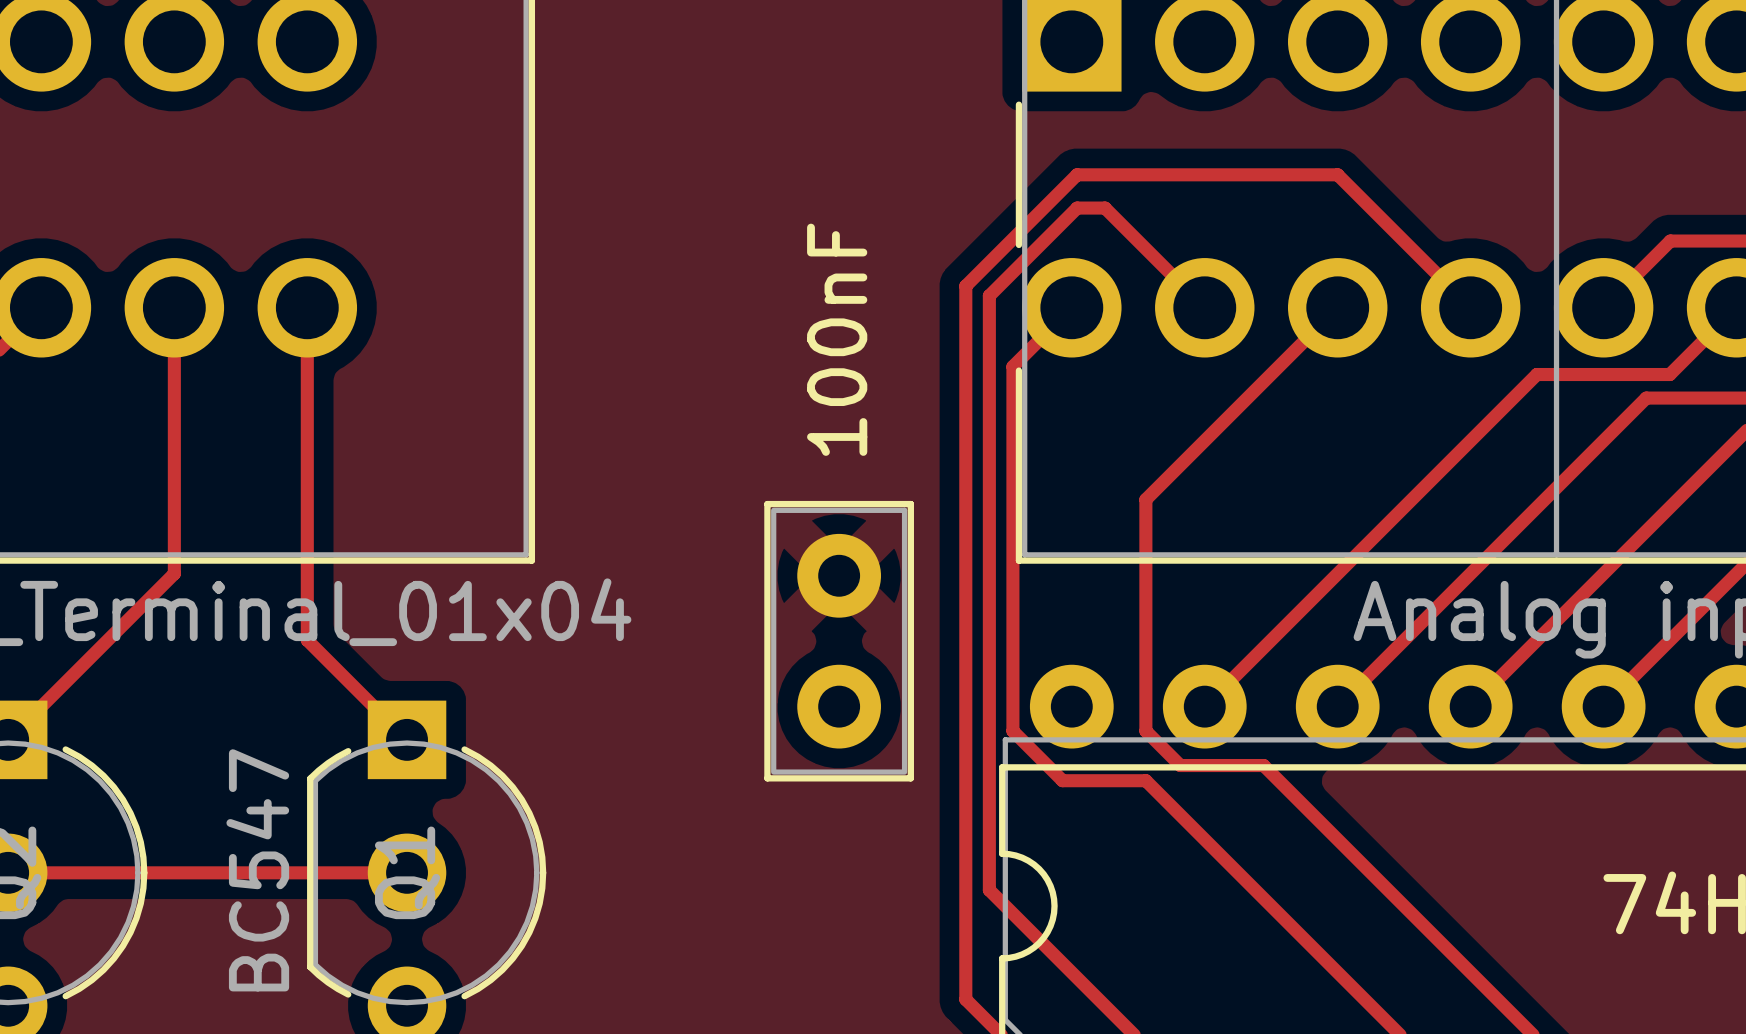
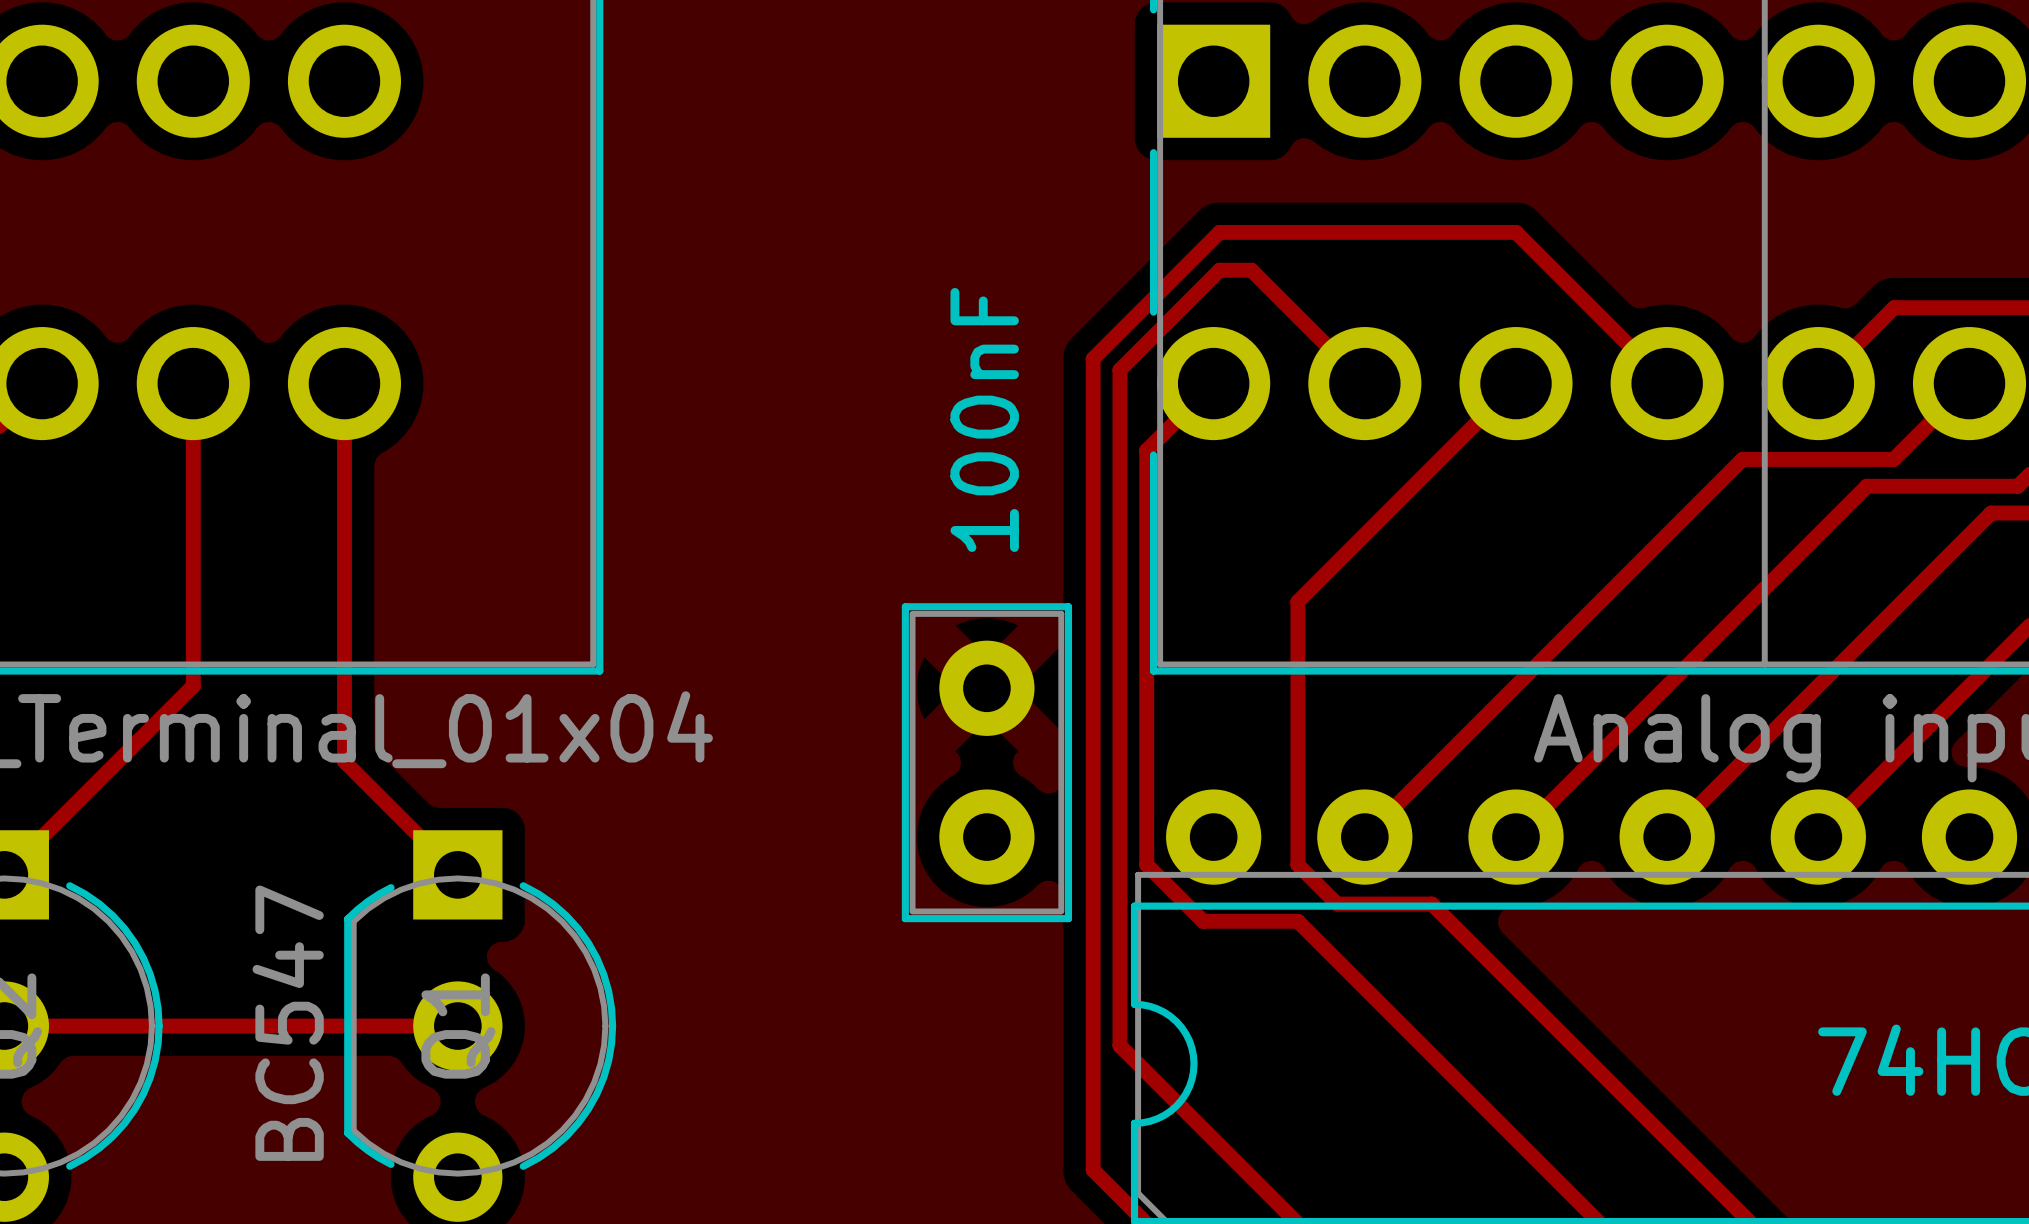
part position: (839, 641) -> (986, 762)

